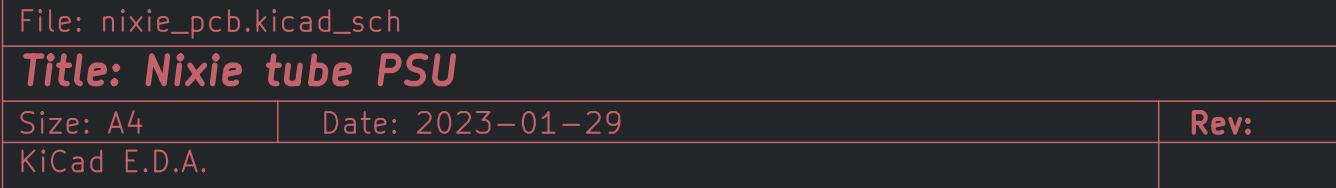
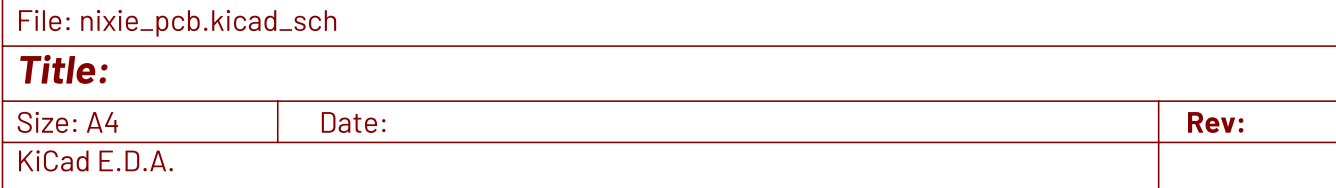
title block: Title: Nixie tube PSU (239, 69) -> Title: (63, 69)
title block: Date: 2023-01-29 (472, 122) -> Date: (353, 122)

